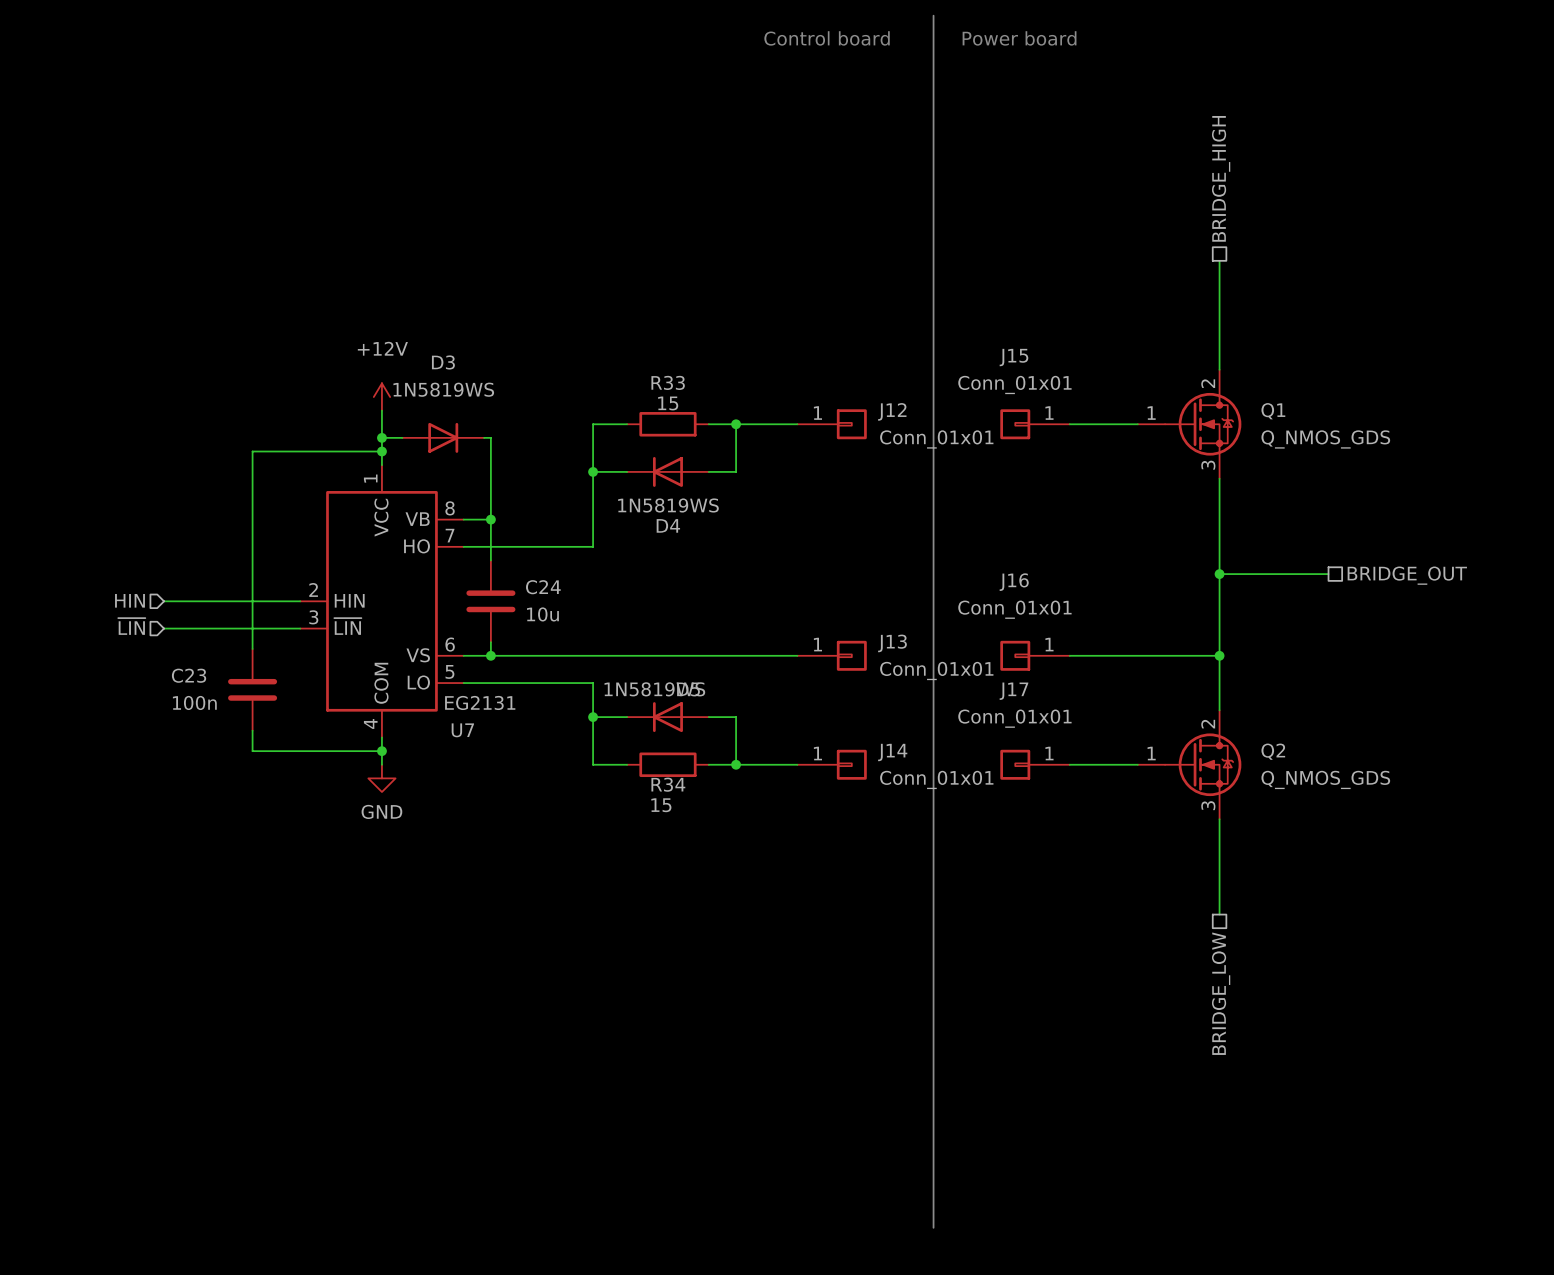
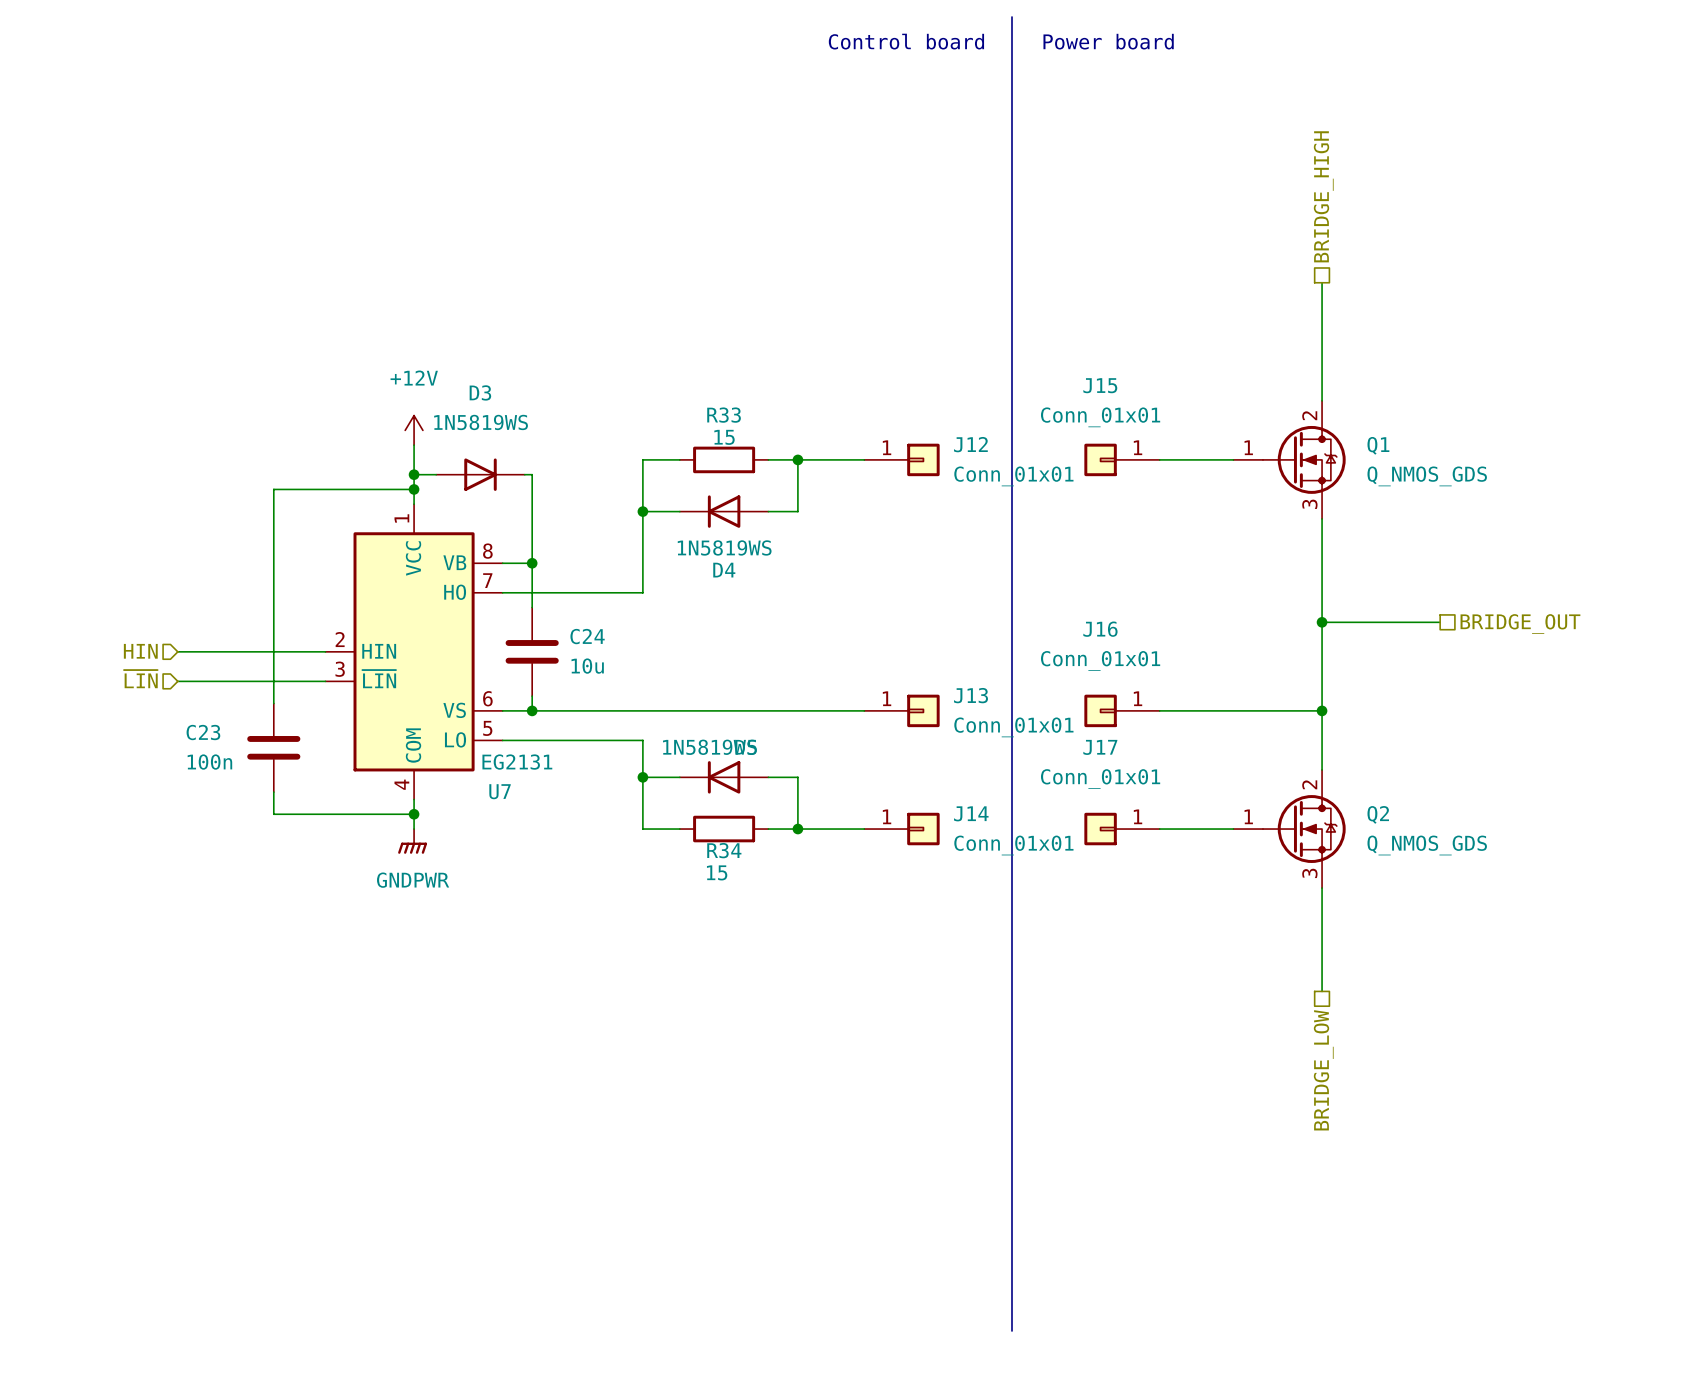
power symbol: GND (381, 778) -> GNDPWR (412, 841)

